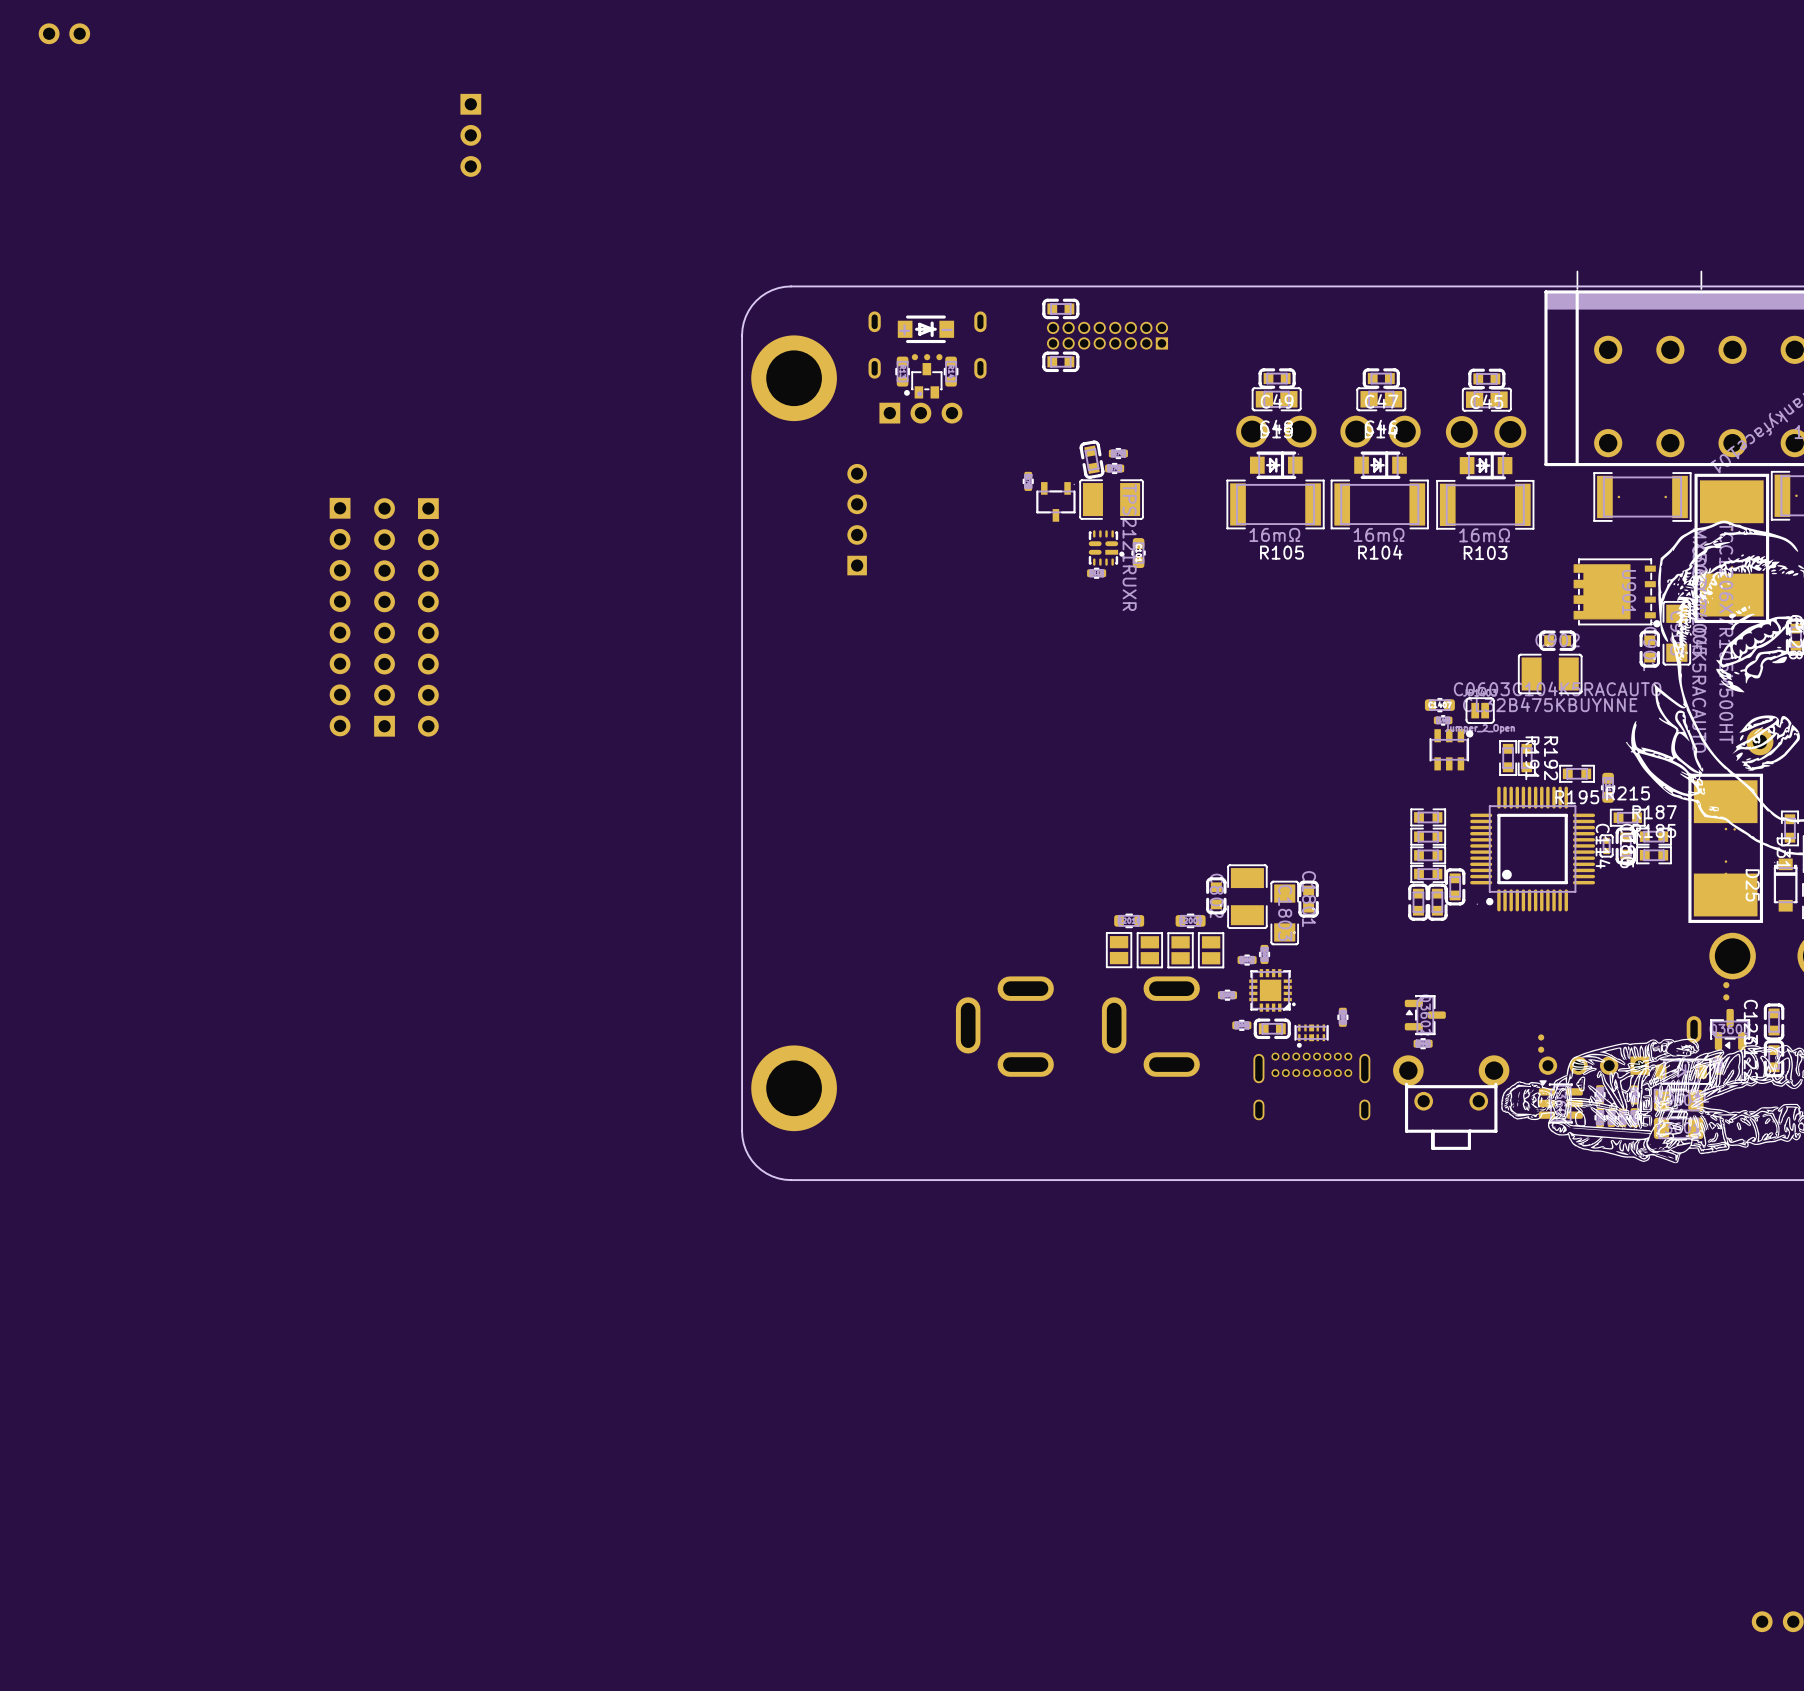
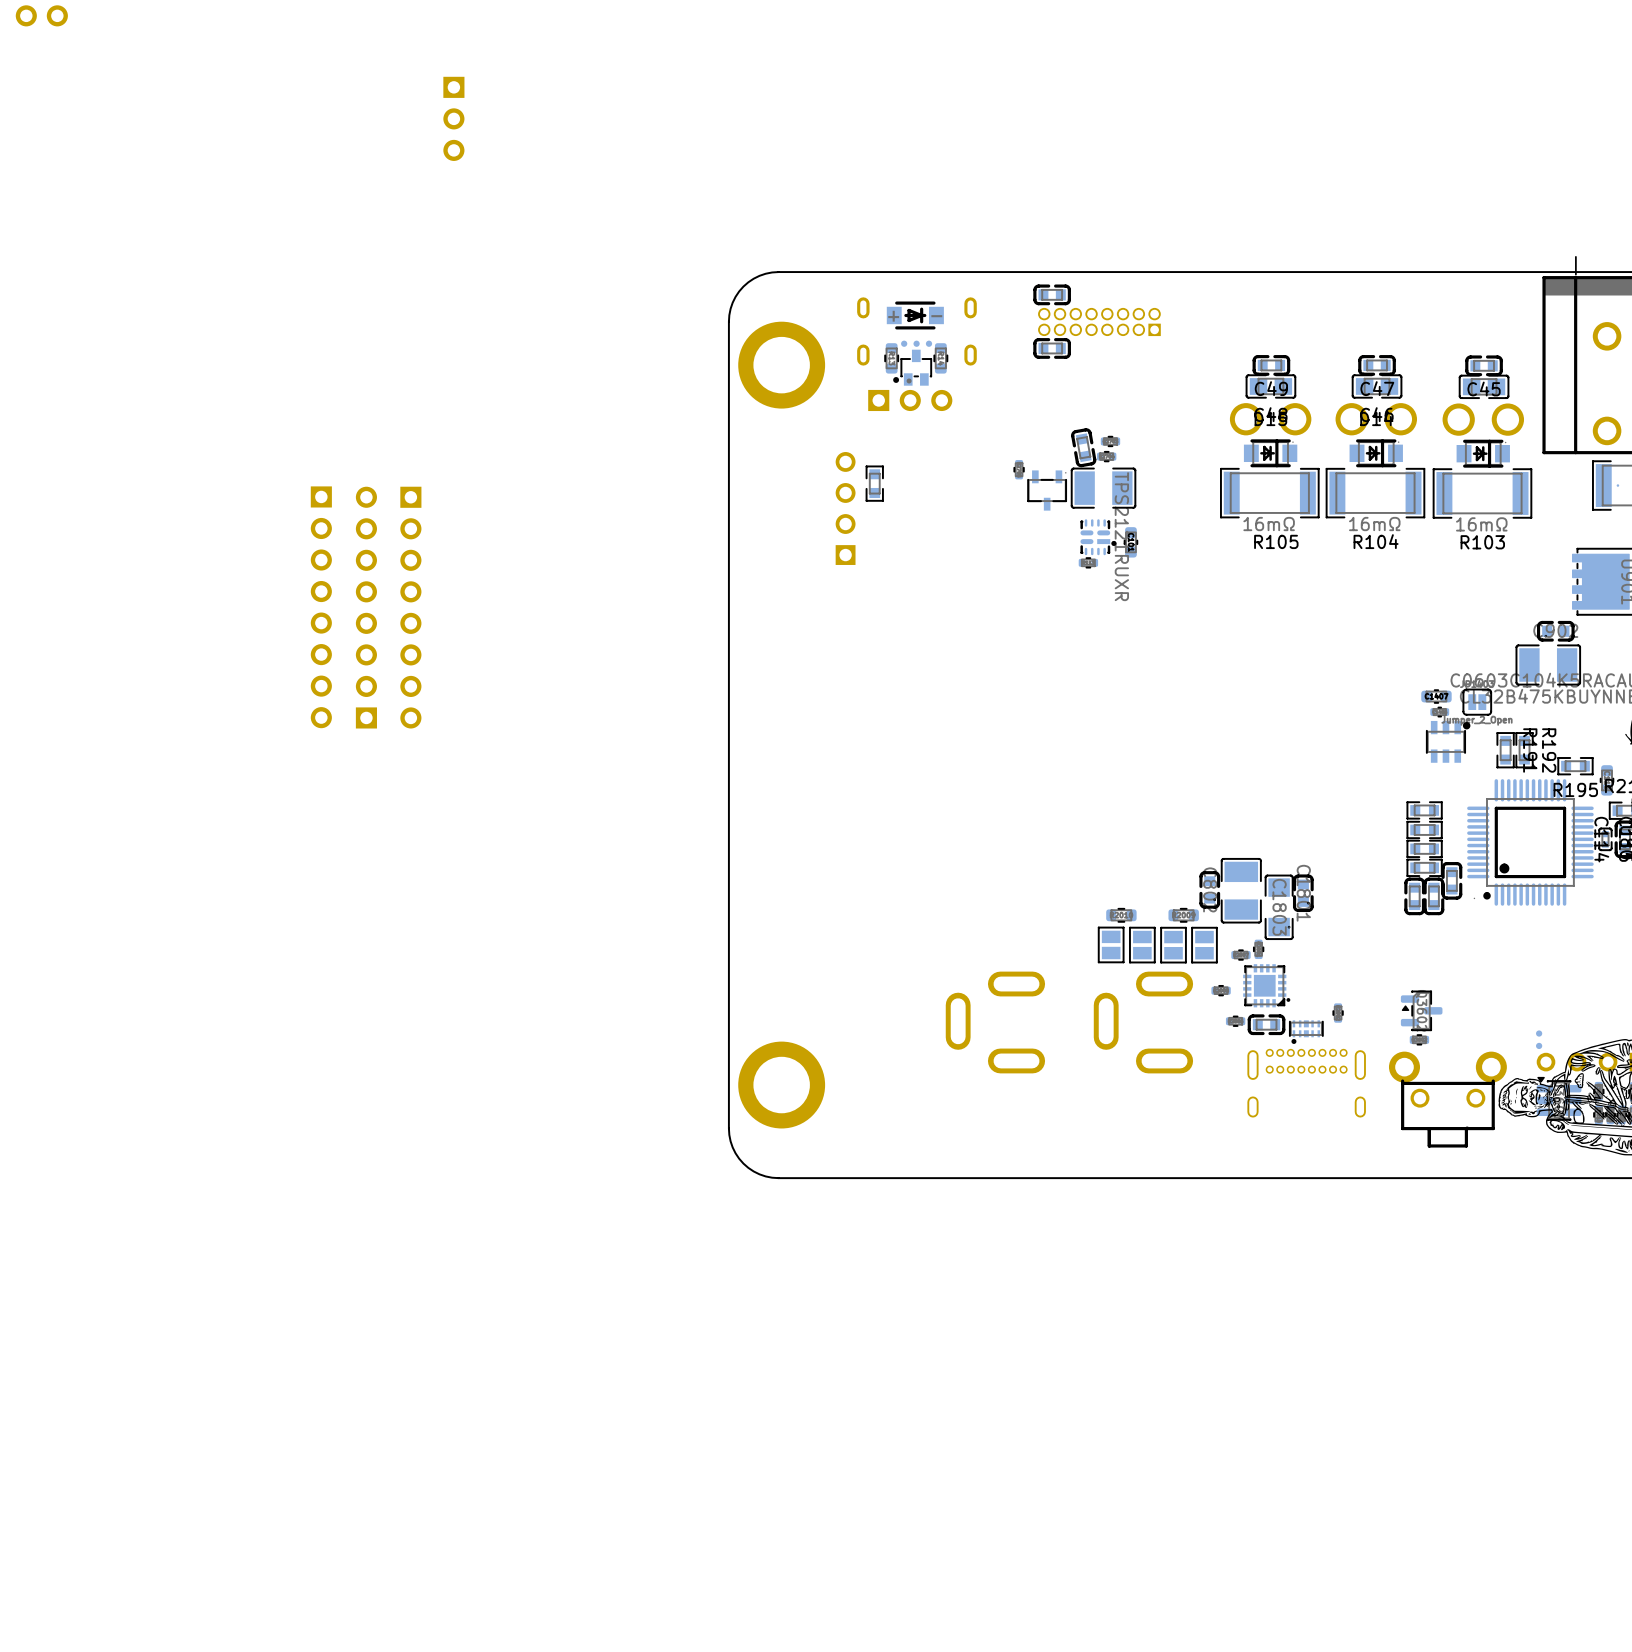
part: none -> (874, 483)

